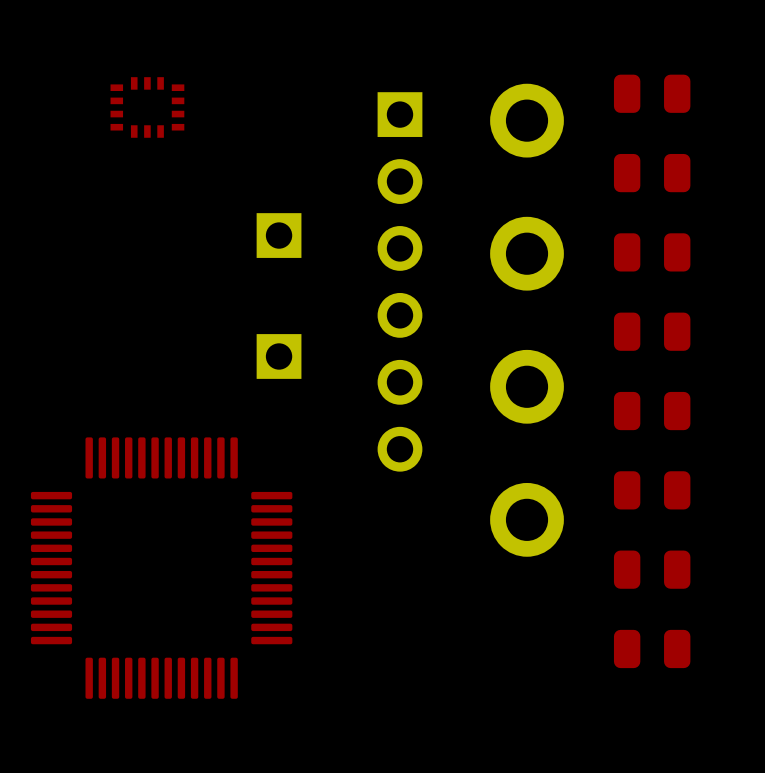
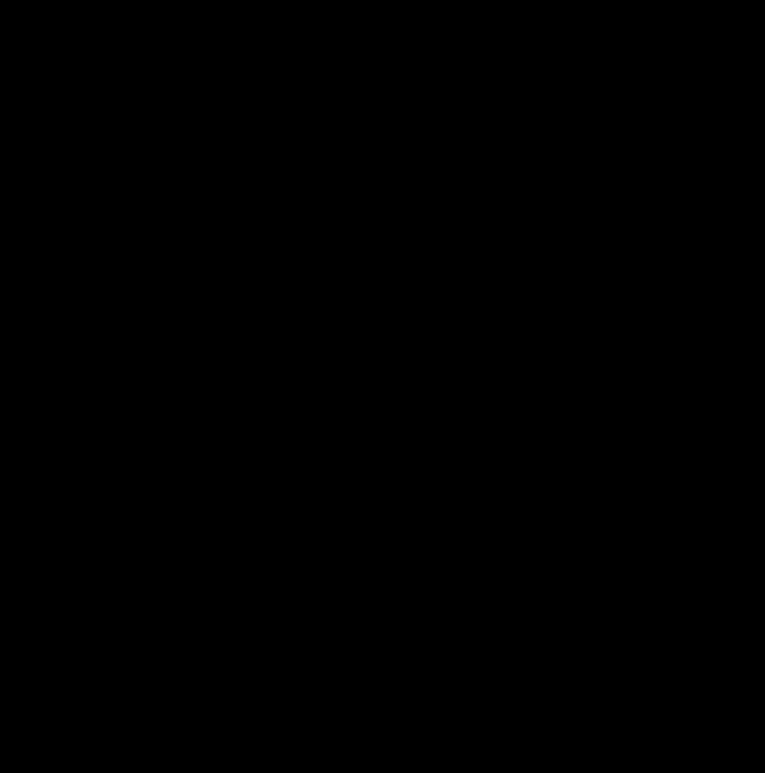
part: (652, 93) -> none
part: (147, 107) -> none
part: (527, 120) -> none
part: (652, 173) -> none
part: (279, 235) -> none
part: (652, 252) -> none
part: (527, 253) -> none
part: (399, 281) -> none
part: (652, 331) -> none
part: (279, 356) -> none
part: (527, 386) -> none
part: (652, 411) -> none
part: (652, 490) -> none
part: (527, 519) -> none
part: (161, 568) -> none
part: (652, 569) -> none
part: (652, 648) -> none

